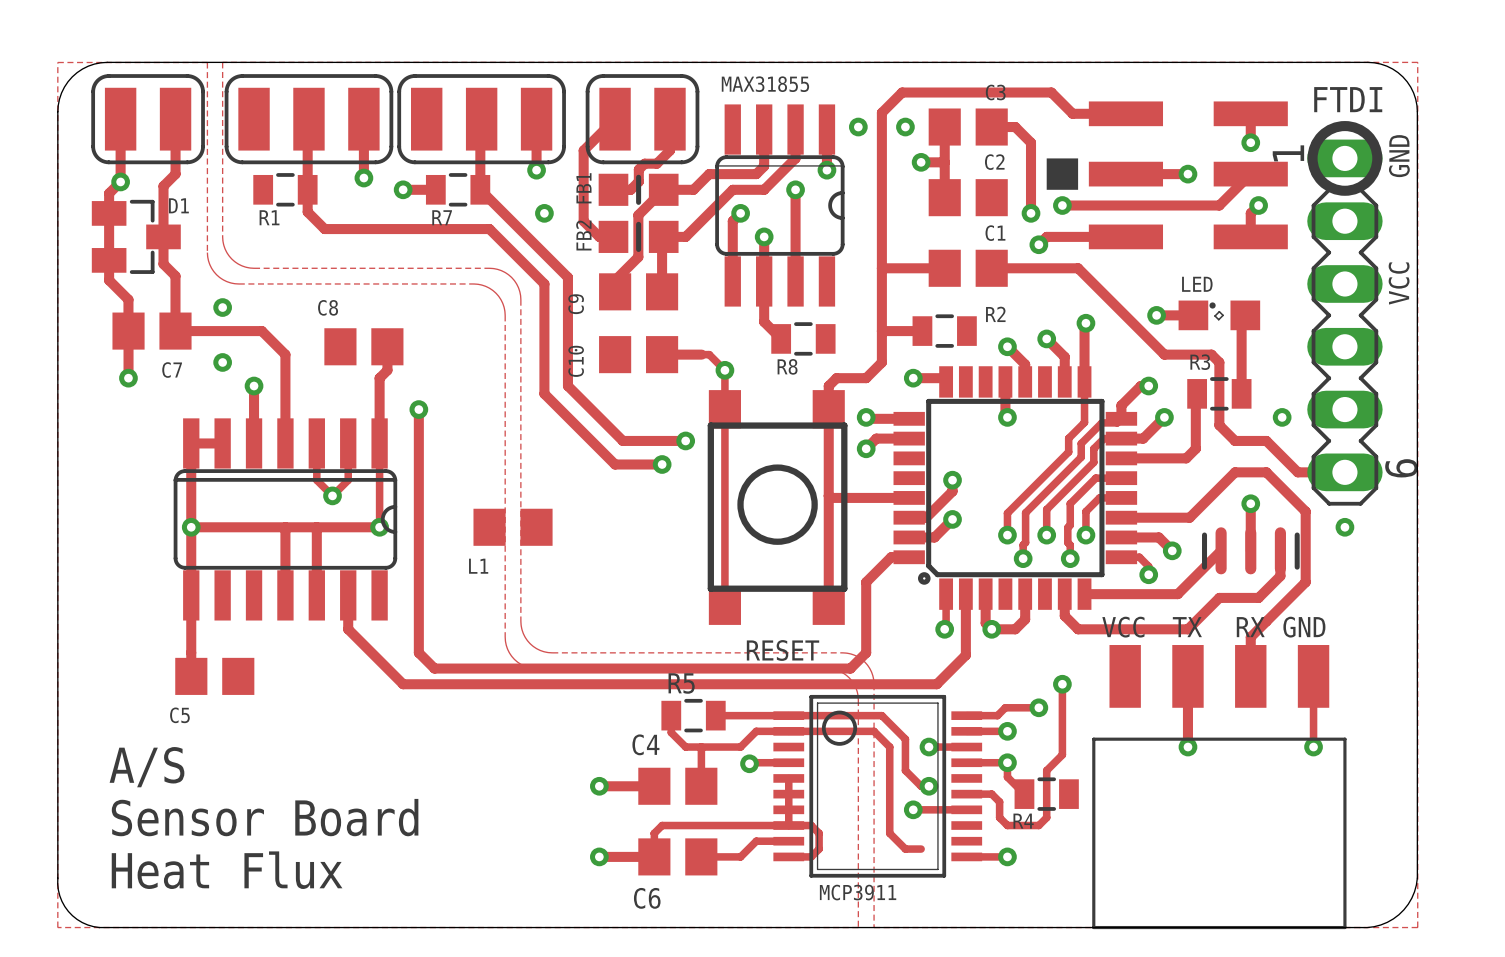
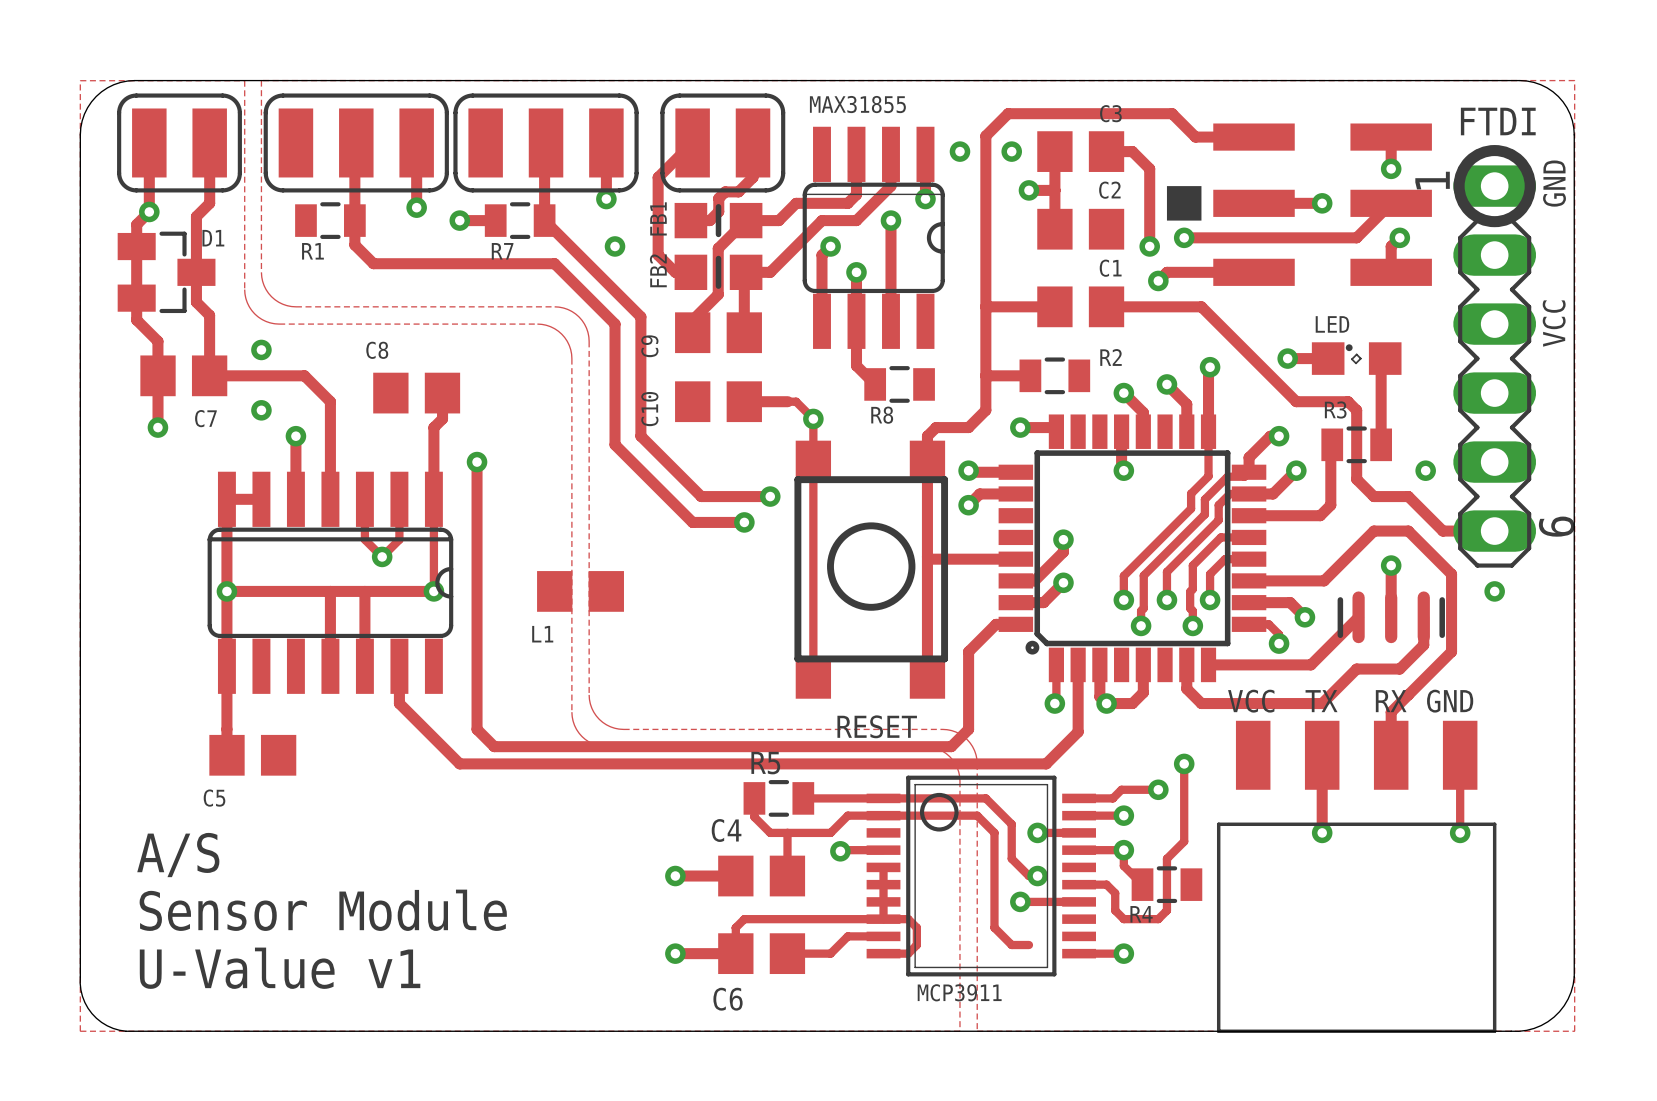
text: Sensor Board (265, 817) -> Sensor Module (323, 910)
text: Heat Flux (227, 870) -> U-Value v1 (280, 968)

